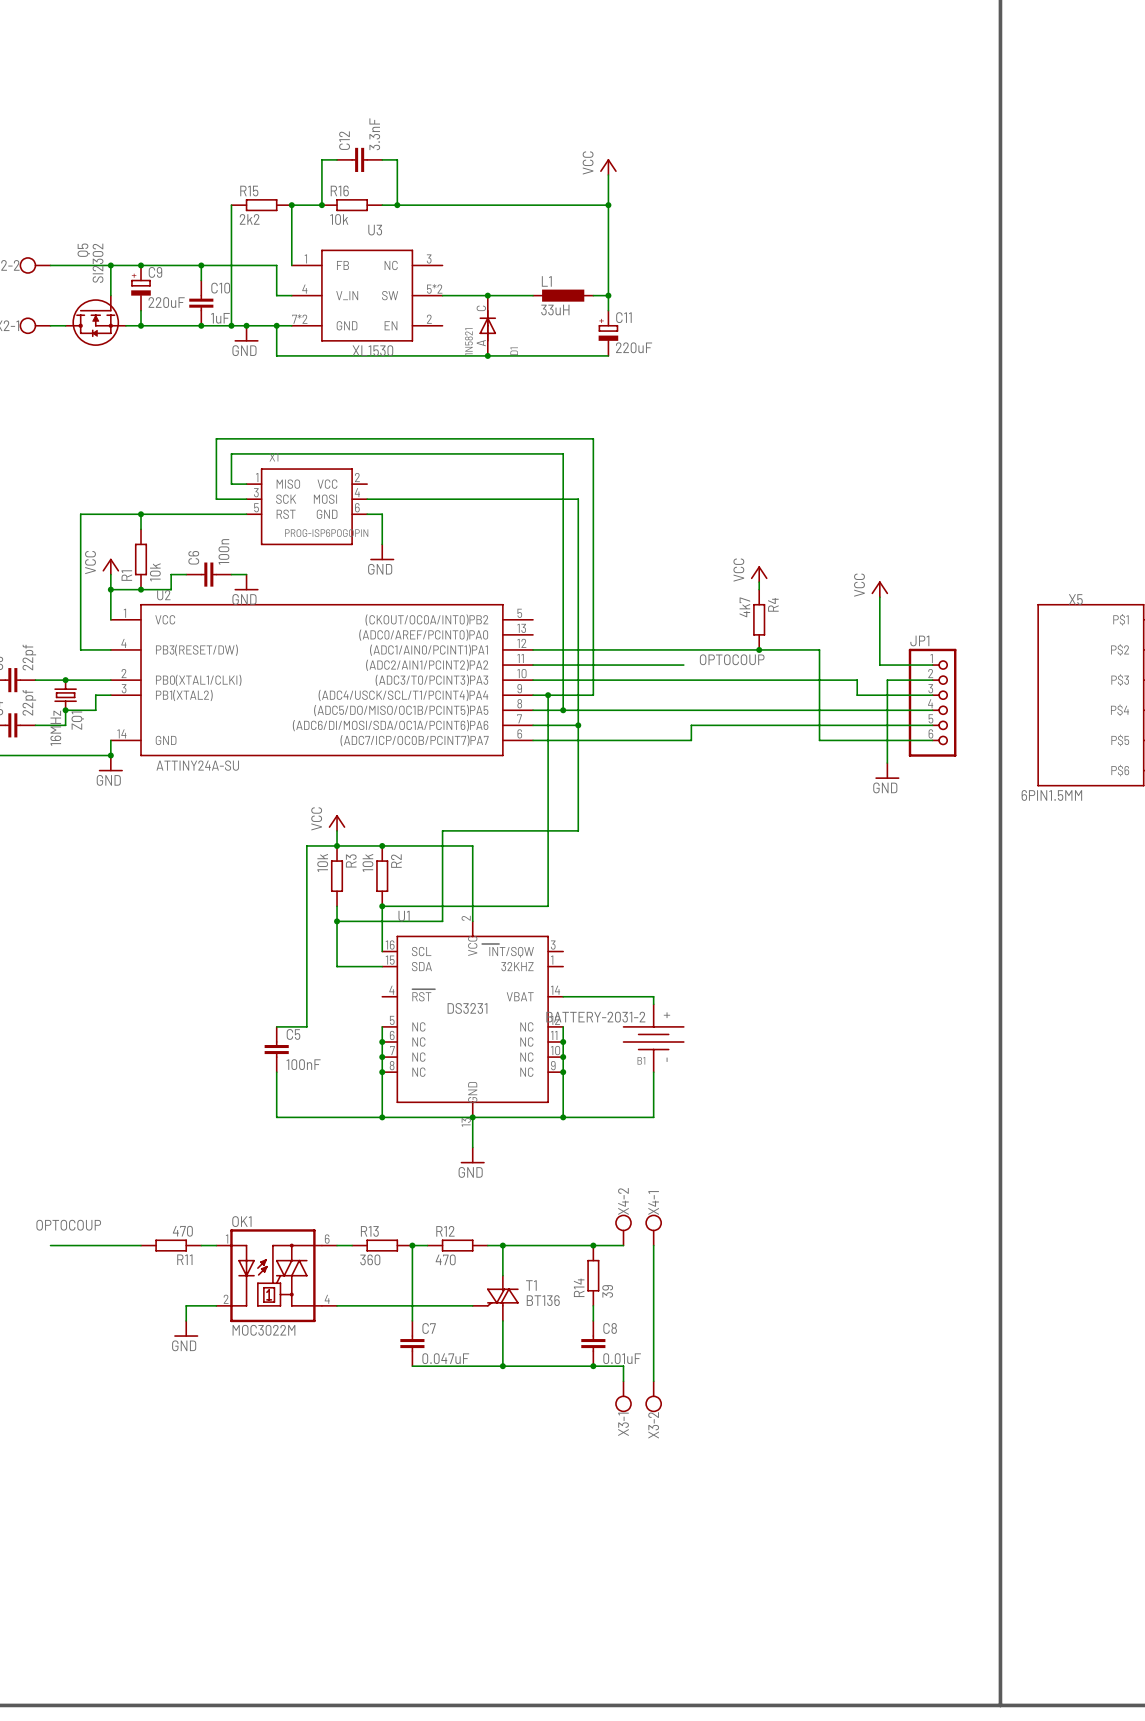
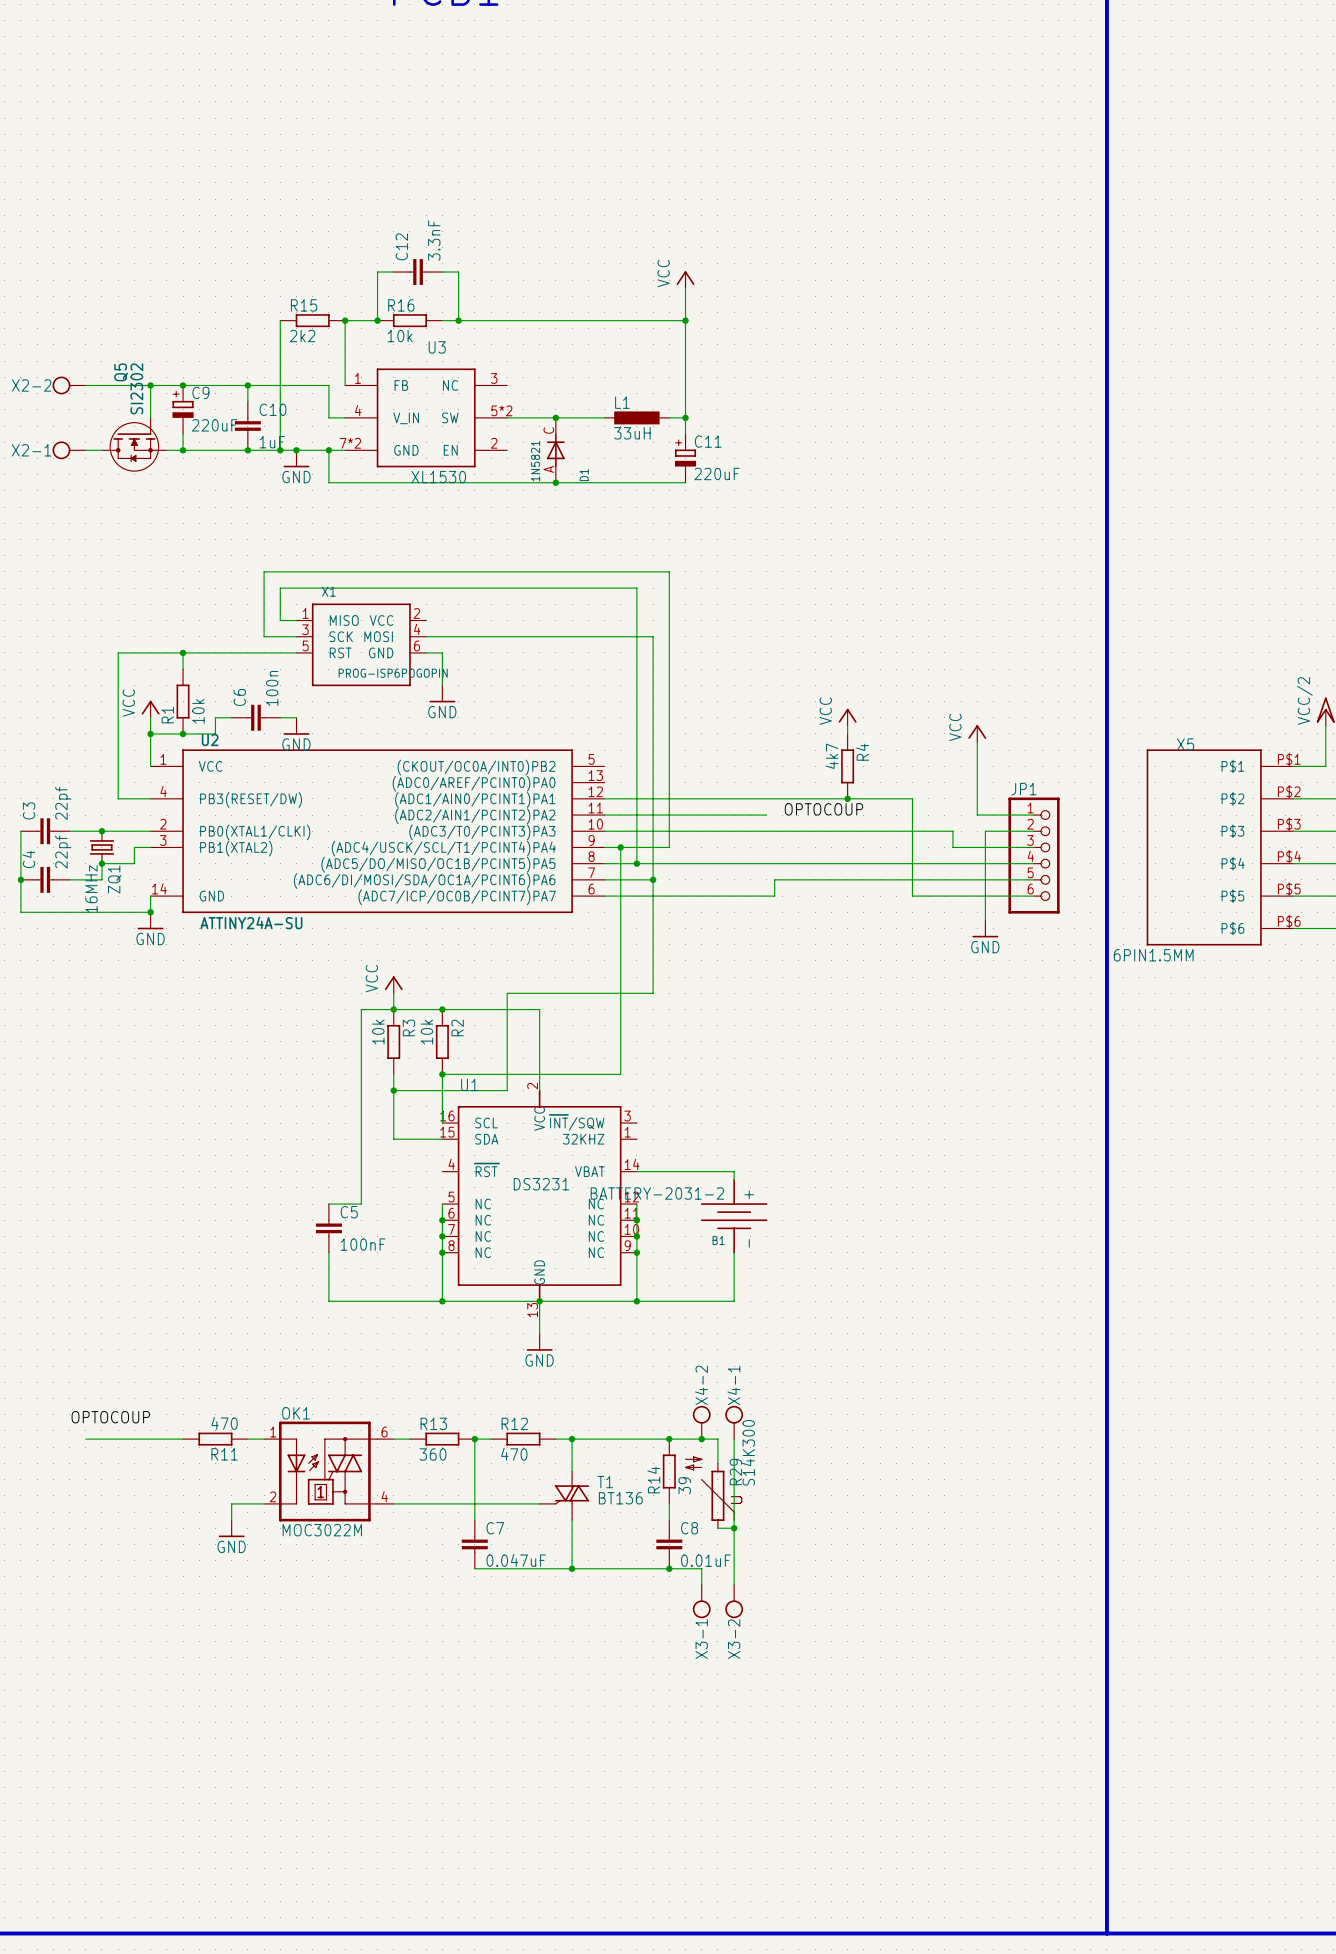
wire: none -> (701, 1439) (717, 1439) (717, 1463)
junction: none -> (701, 1439)
R29: none -> S14K300 (713, 1492)
wire: none -> (717, 1528) (734, 1528)
junction: none -> (734, 1528)

